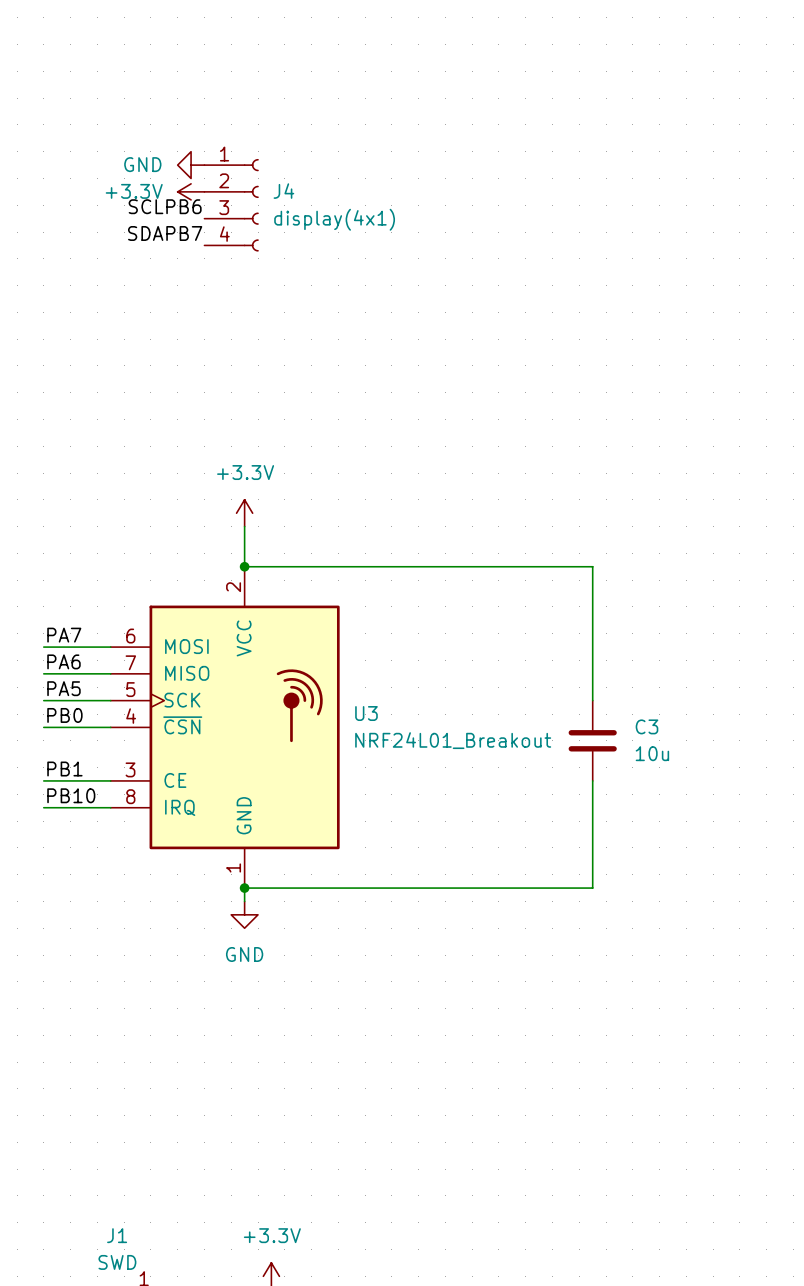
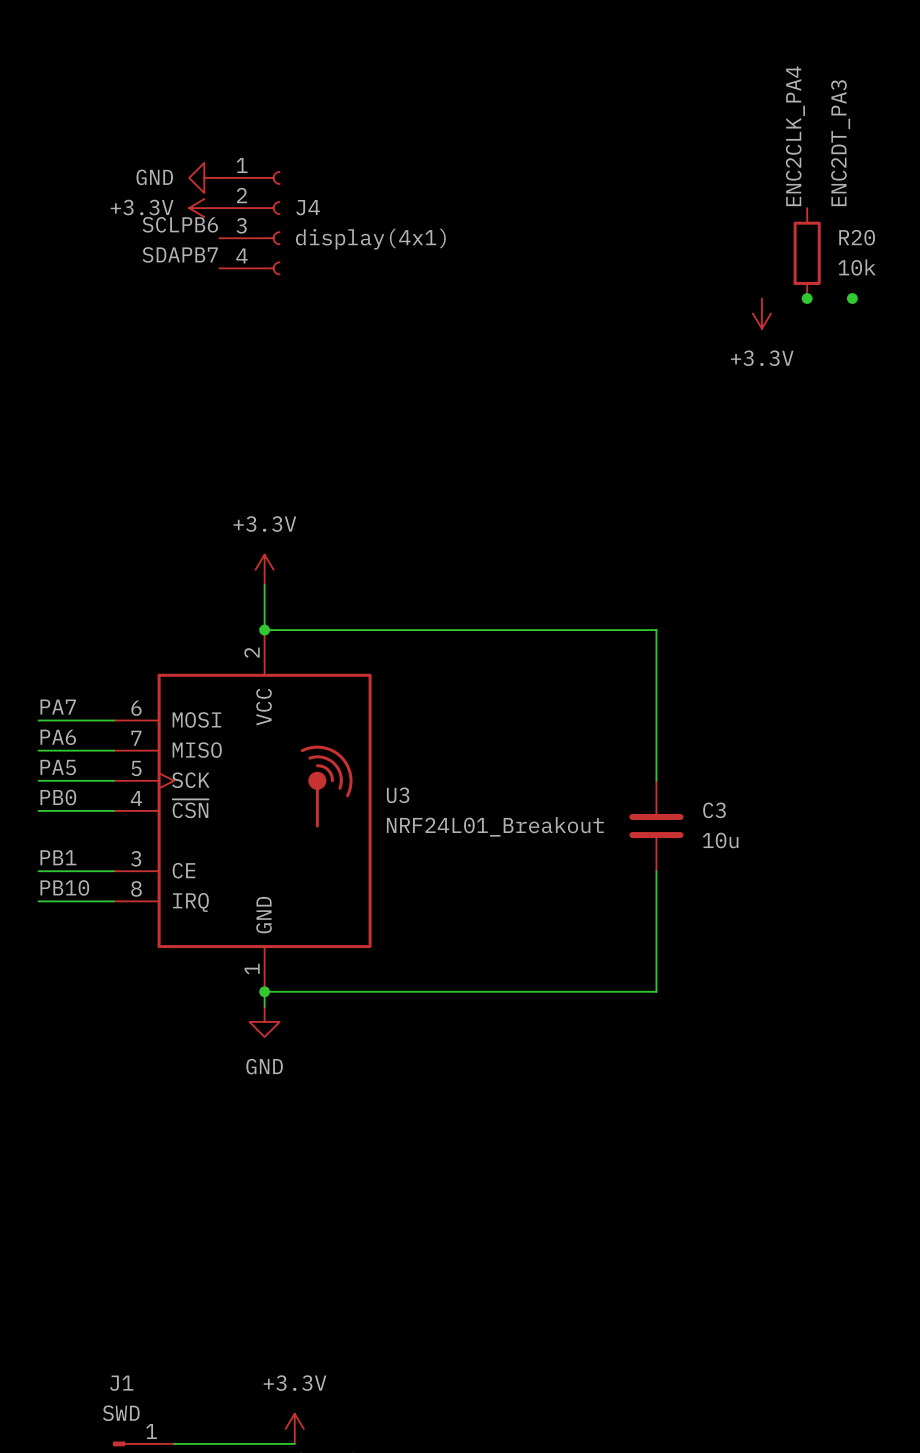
label: none -> ENC2CLK_PA4 (795, 136)
label: none -> ENC2DT_PA3 (840, 143)
R20: none -> 10k (807, 253)
junction: none -> (807, 298)
junction: none -> (852, 298)
power symbol: none -> +3.3V (761, 313)

